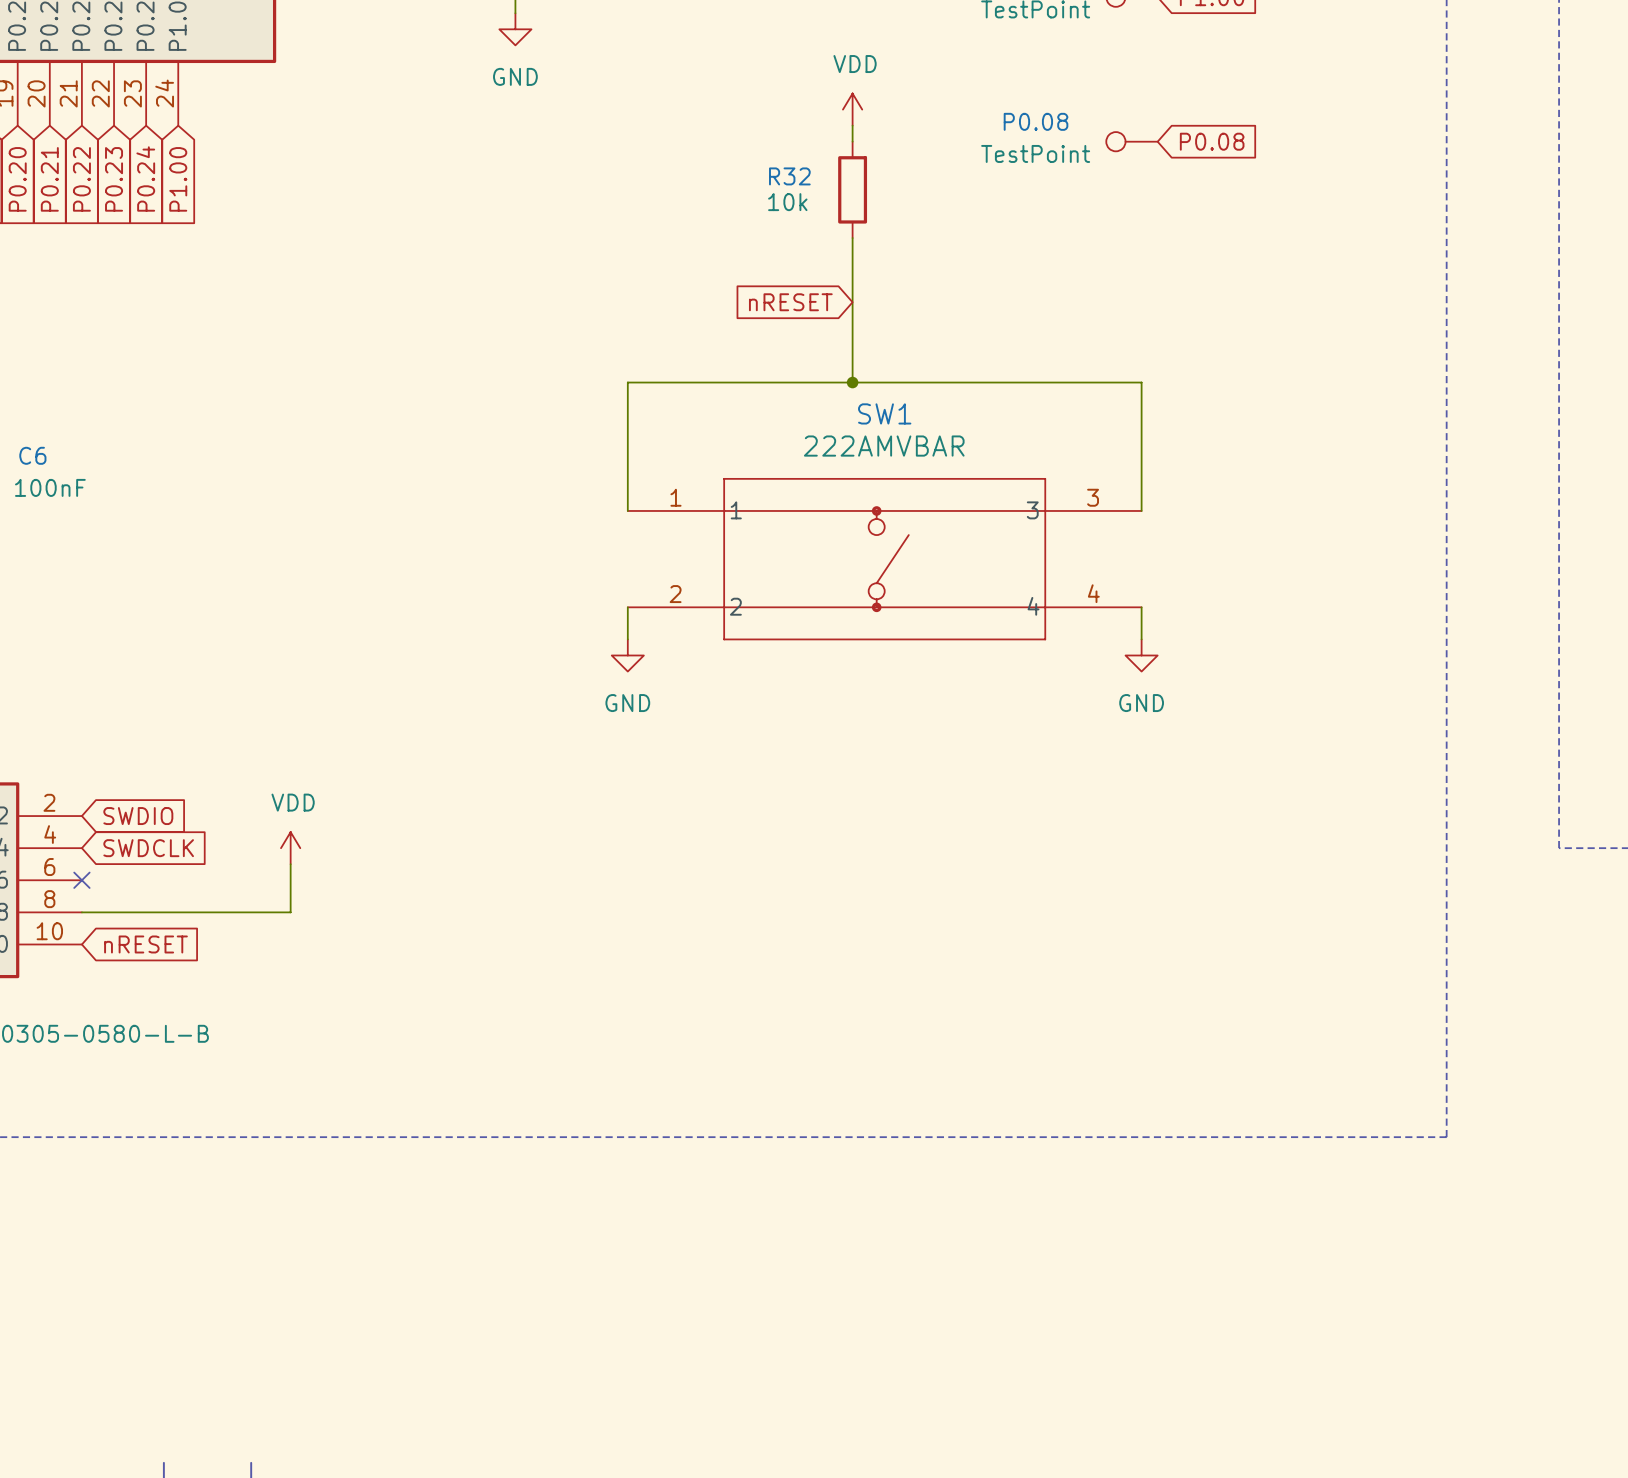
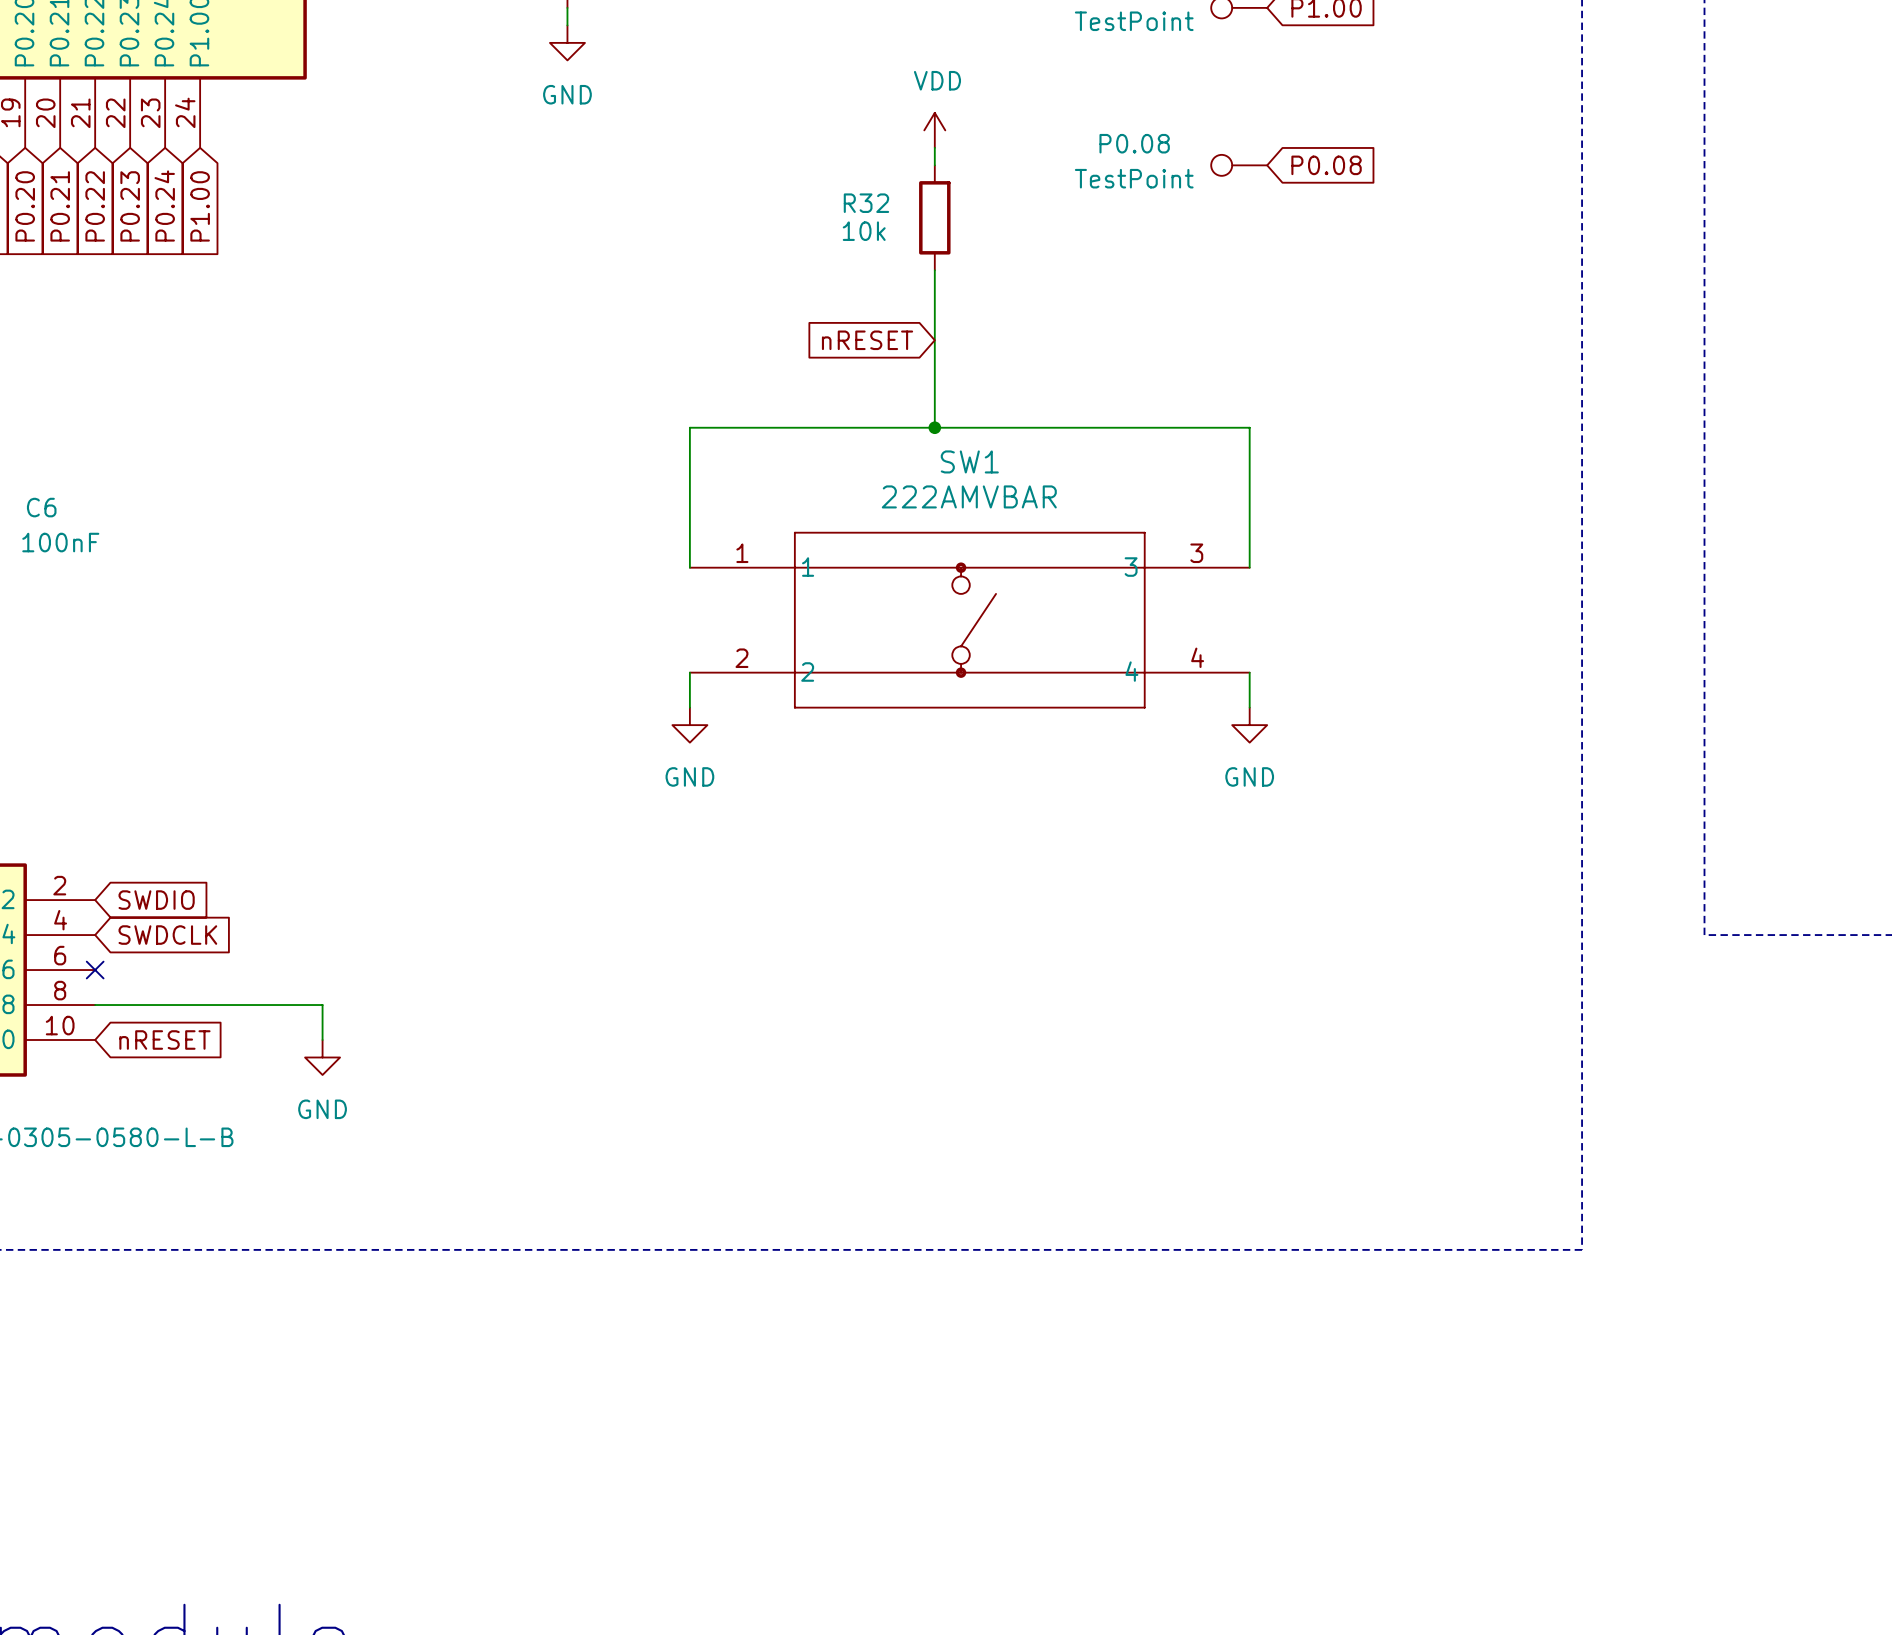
power symbol: VDD (290, 848) -> none
wire: (290, 864) (290, 912) -> (322, 1039) (322, 1005)
power symbol: none -> GND (322, 1057)

